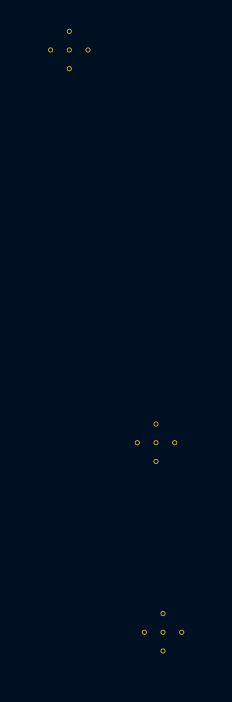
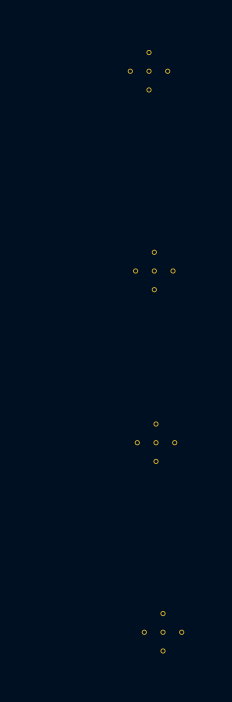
part position: (69, 49) -> (148, 71)
part: none -> (154, 270)

